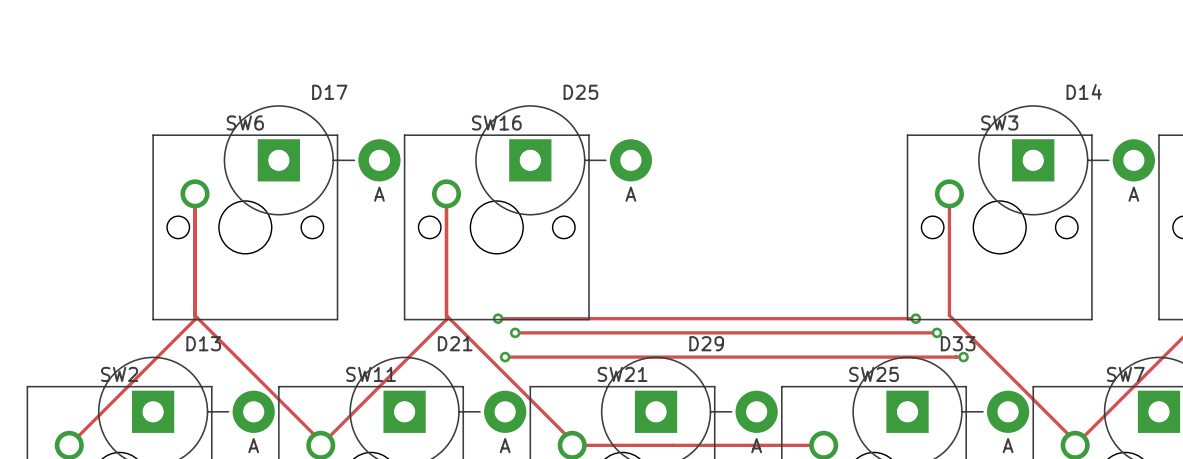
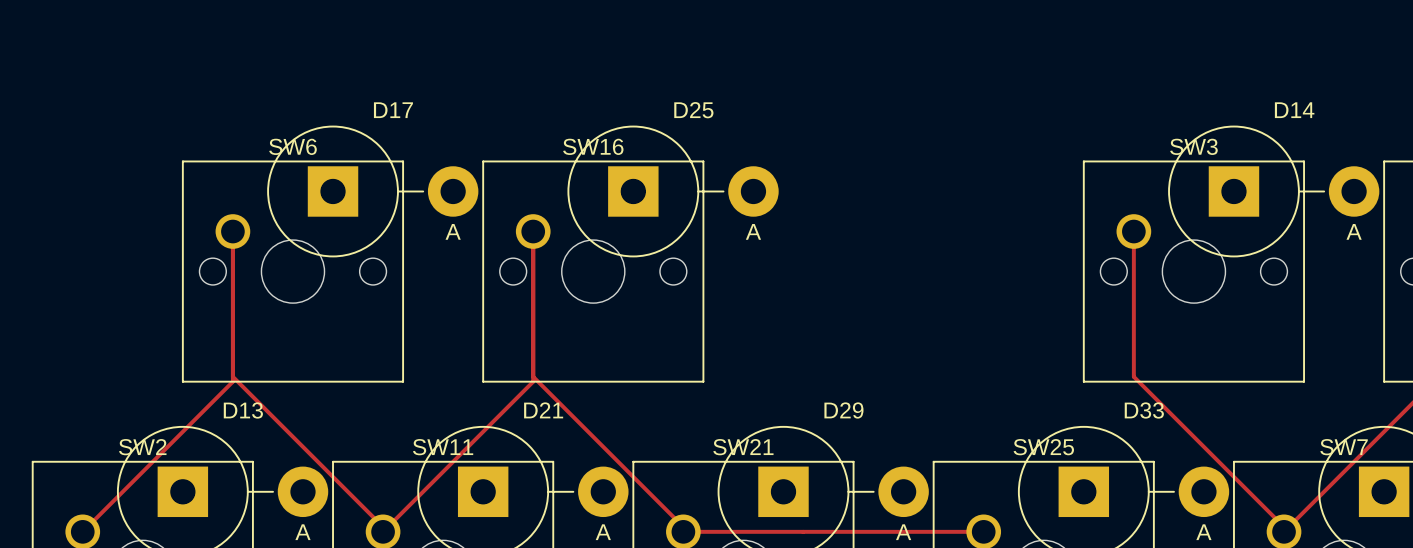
track: (498, 318) (915, 318) -> none
via: (498, 318) -> none
via: (915, 318) -> none
track: (515, 332) (936, 332) -> none
via: (515, 332) -> none
via: (936, 332) -> none
track: (505, 357) (963, 357) -> none
via: (505, 357) -> none
via: (963, 357) -> none

